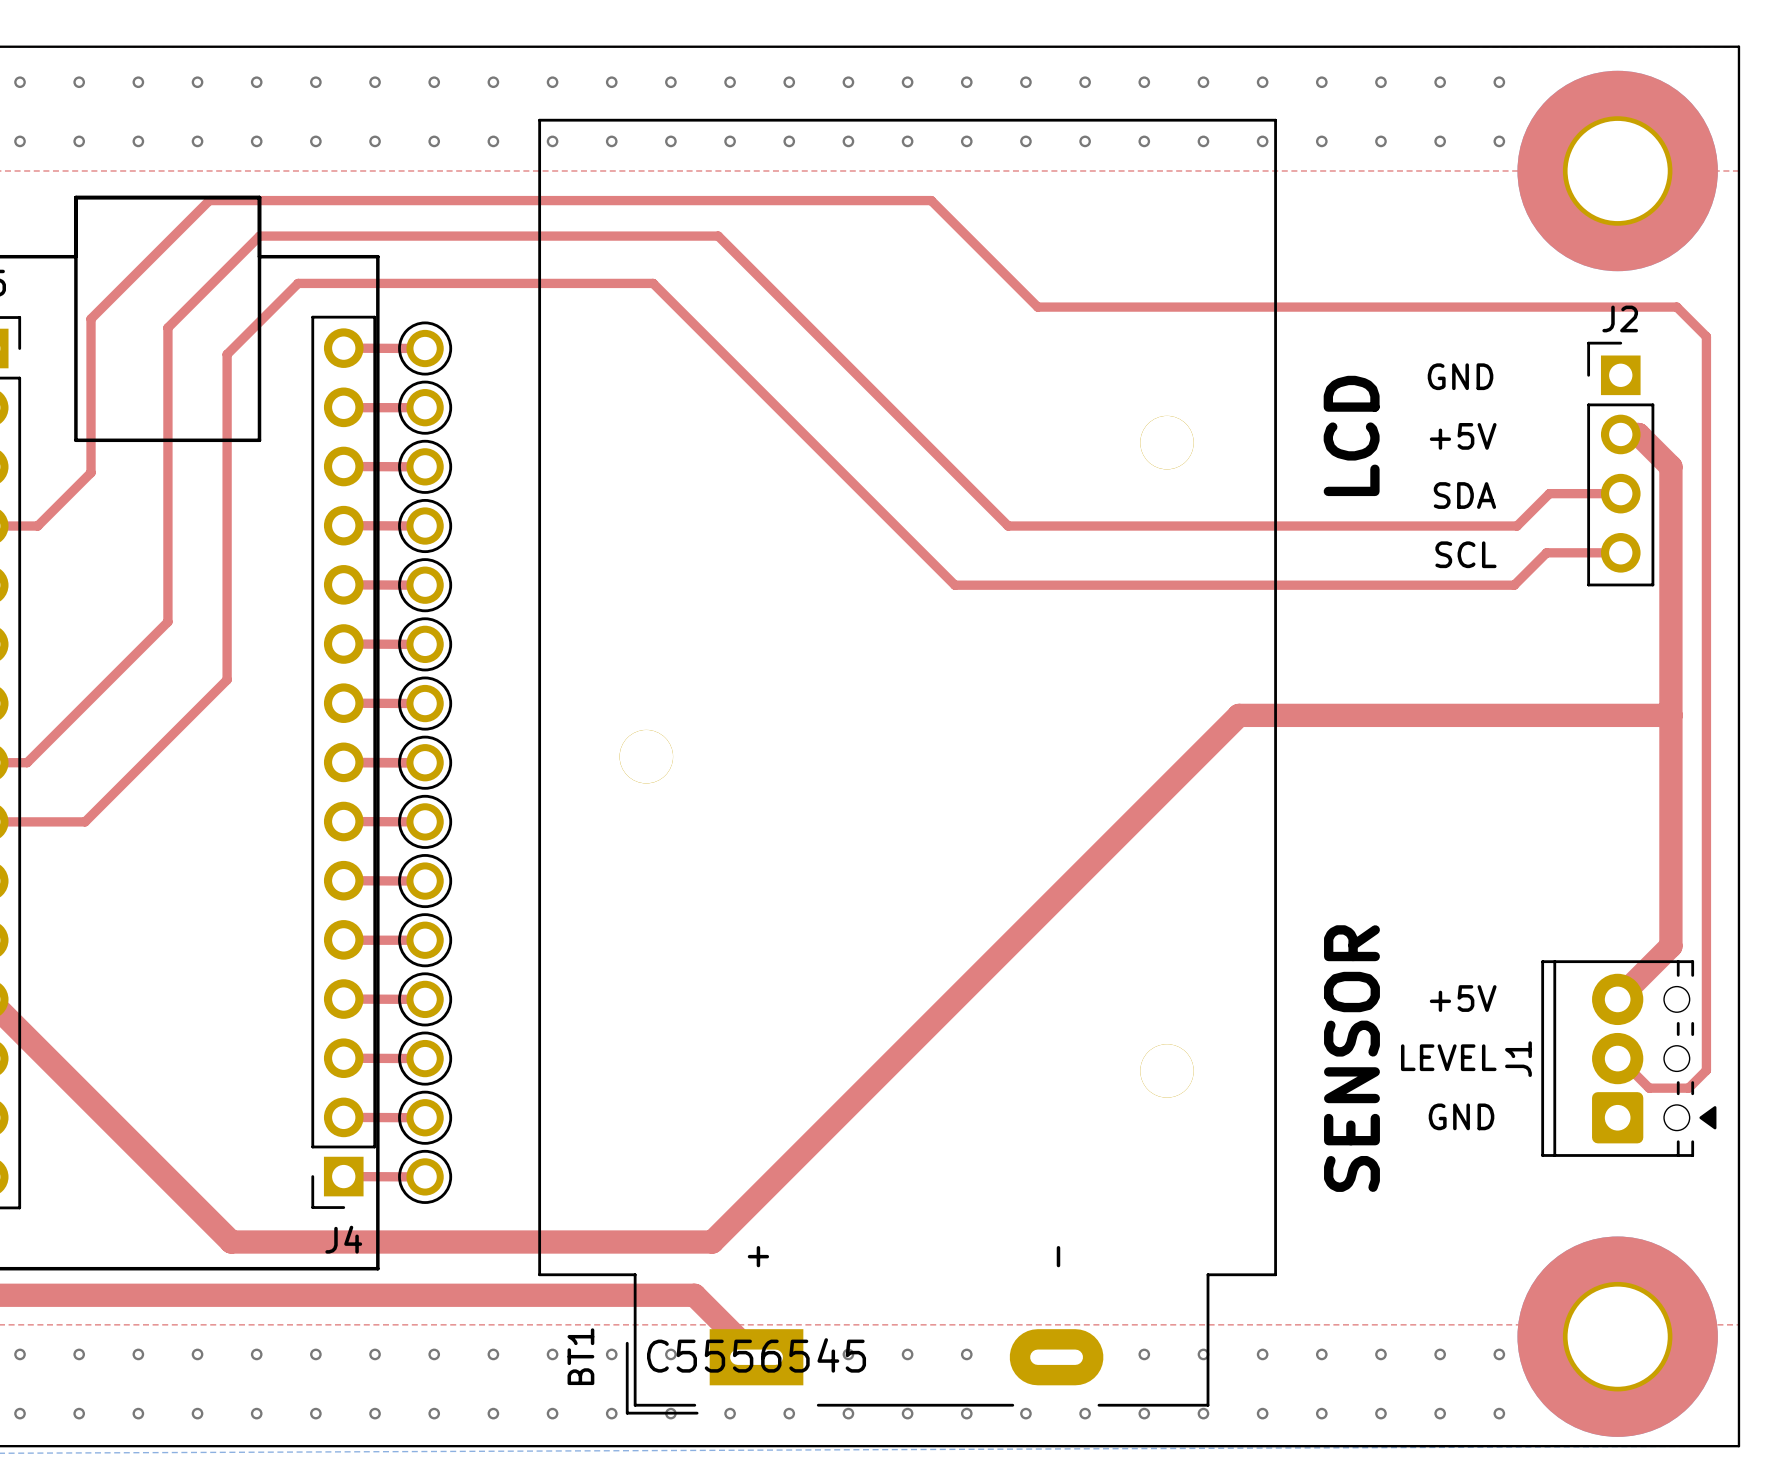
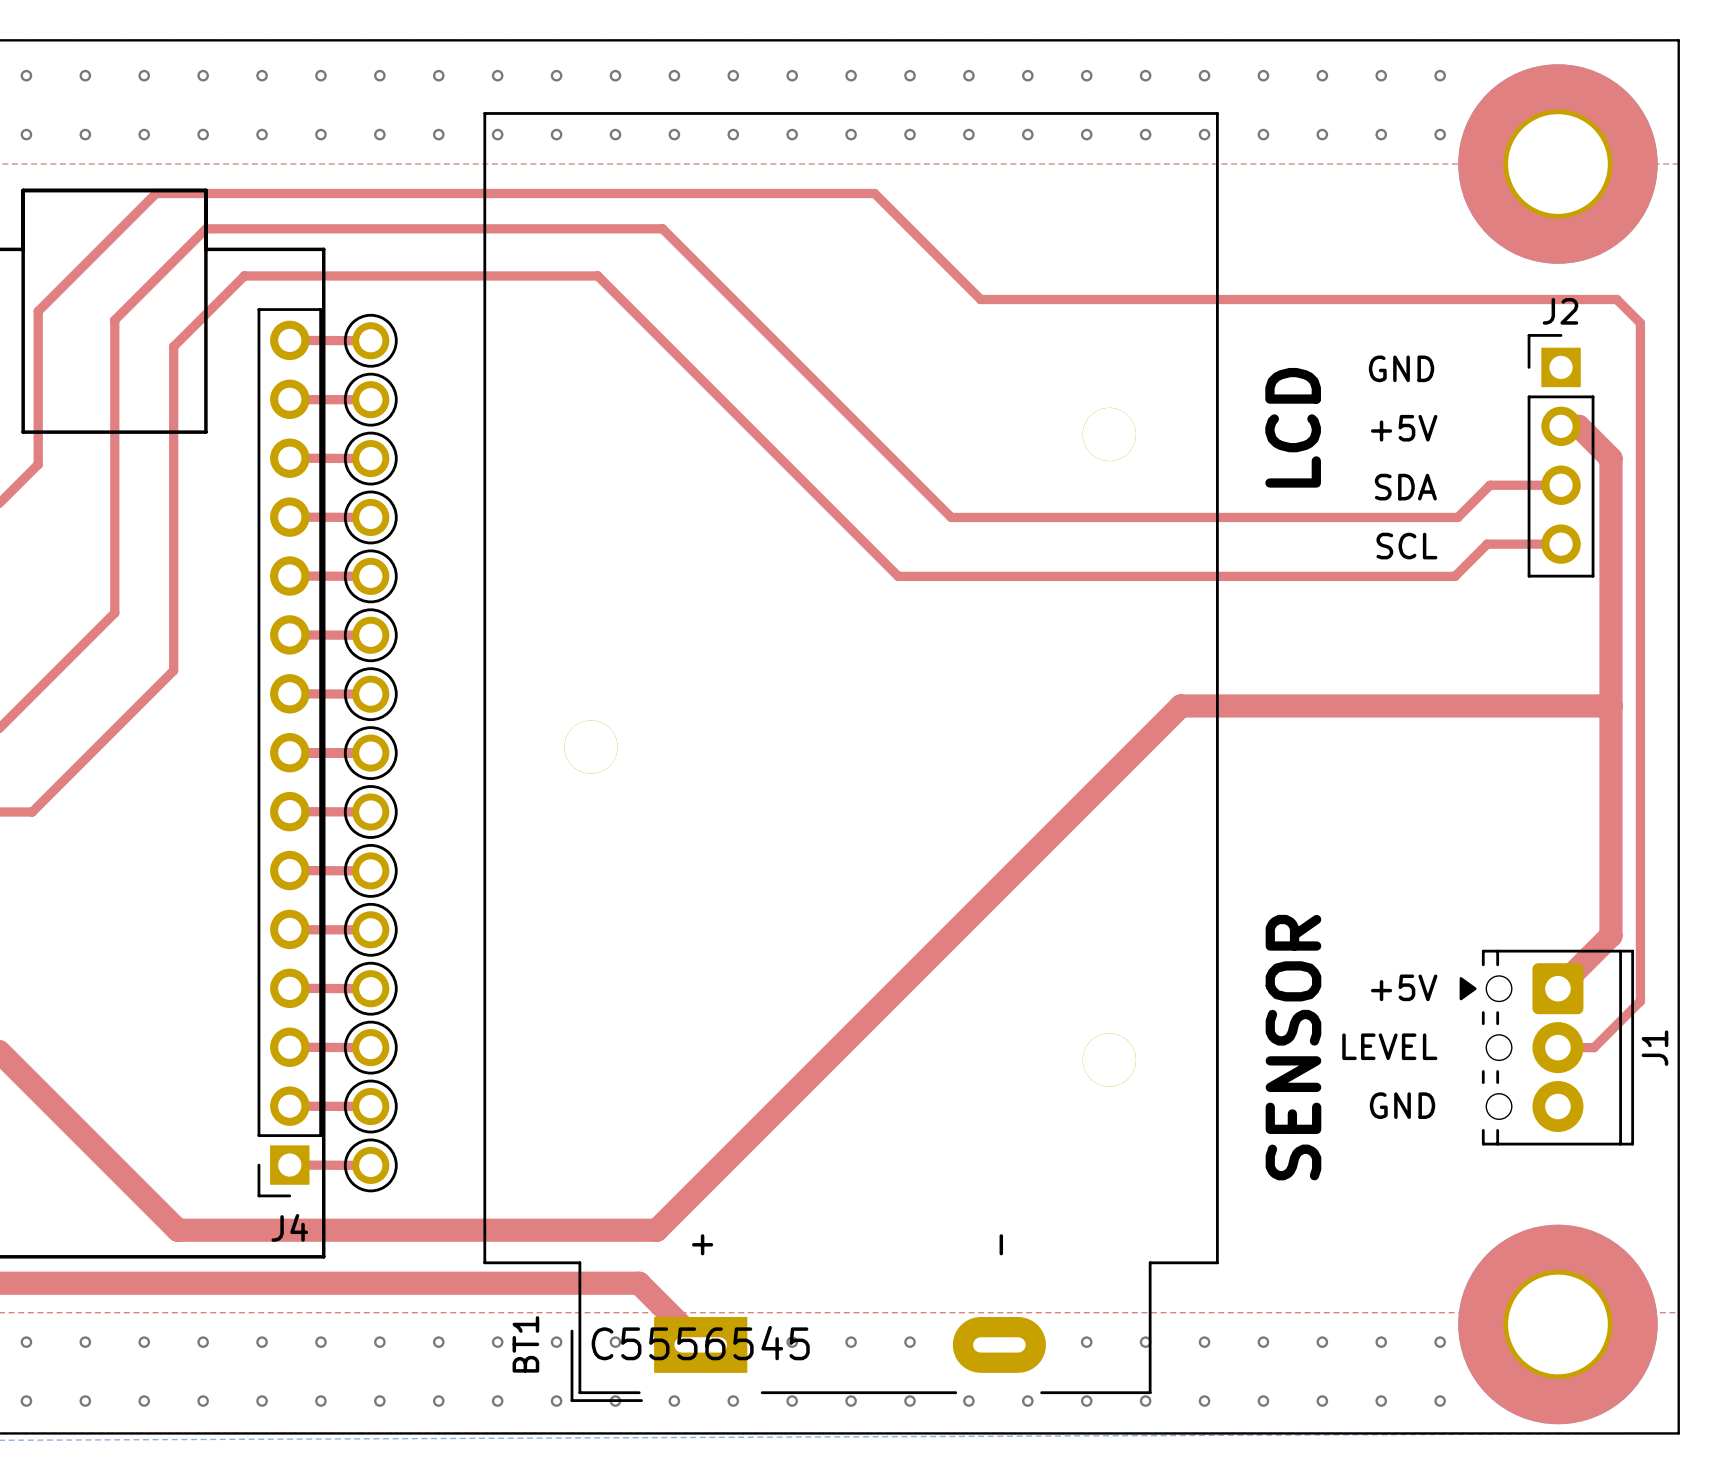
top track: (1700, 330) (1706, 336) (1706, 1070) (1688, 1088) (1649, 1088) (1619, 1058) -> (1640, 323) (1640, 1001) (1594, 1047) (1559, 1047)
J1 rotation: 0° (1628, 1058) -> 180° (1546, 1047)

